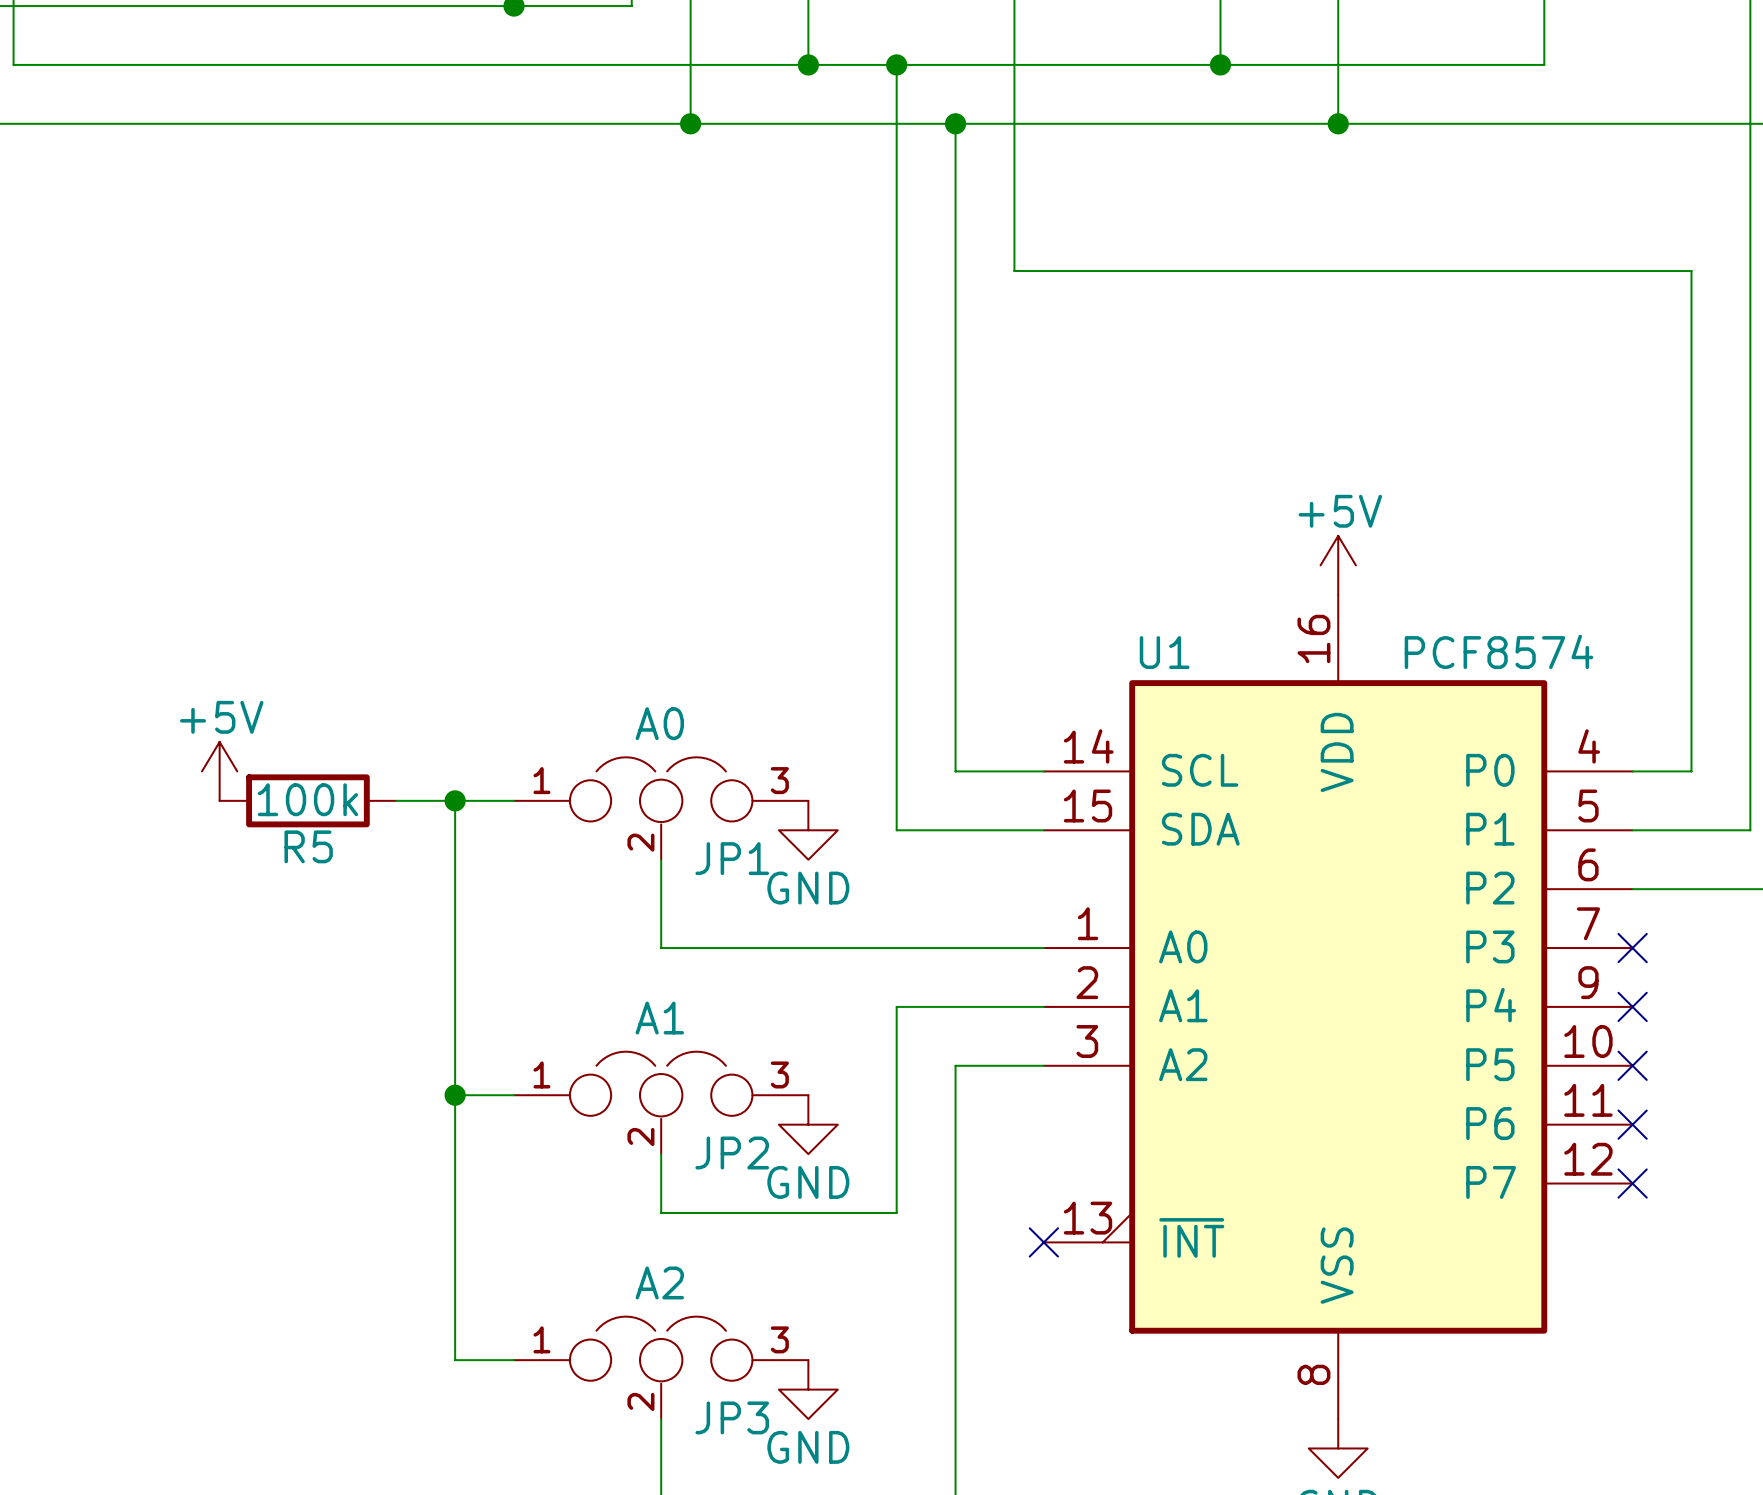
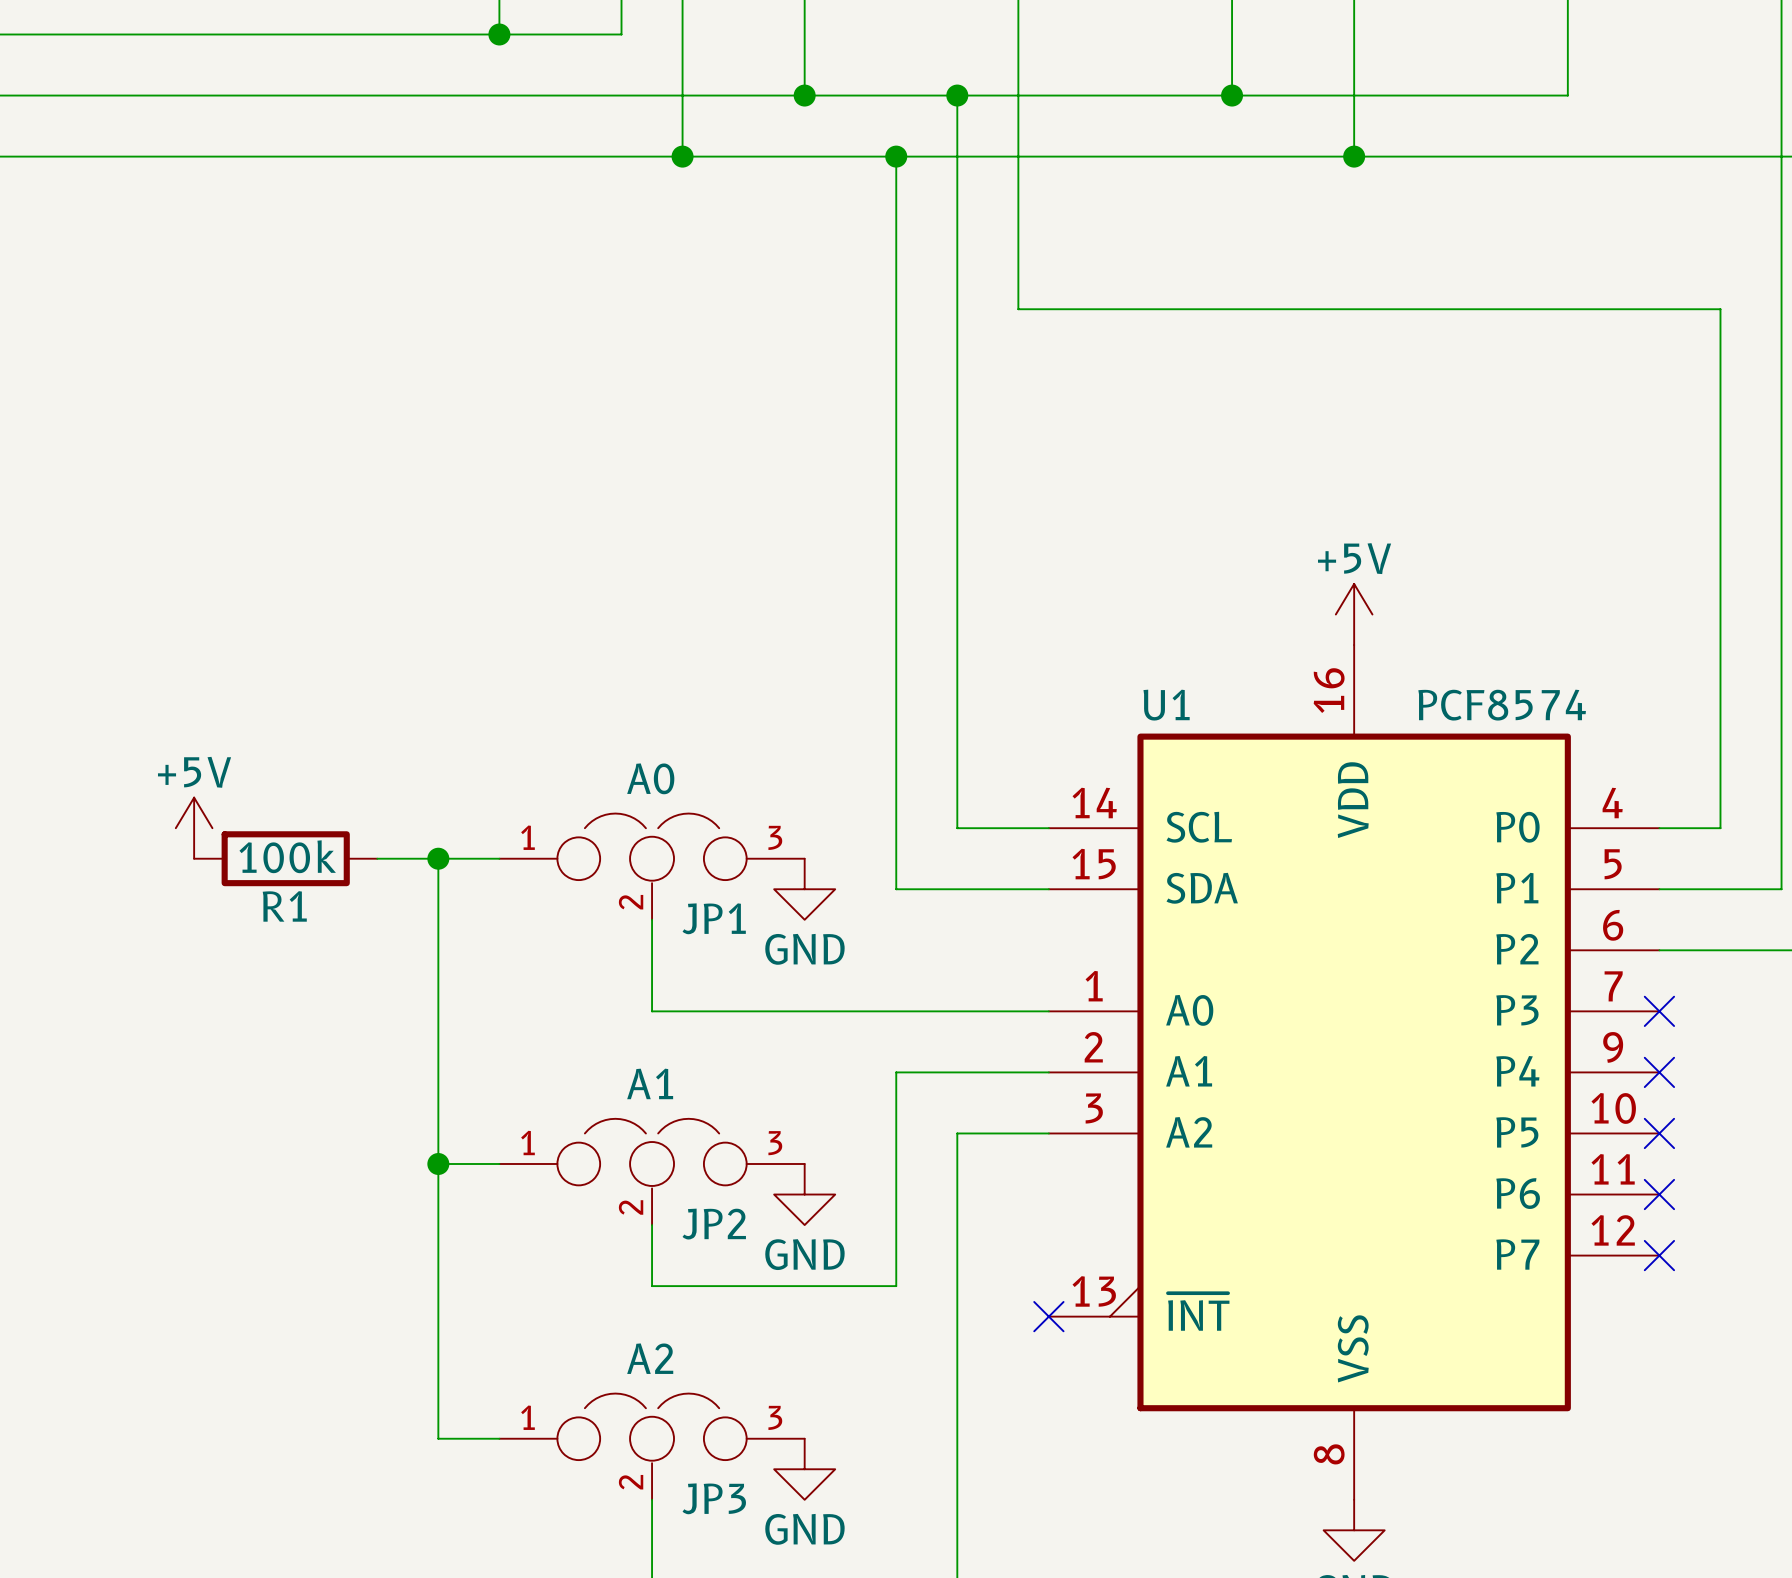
wire: (896, 64) (896, 123) -> (957, 95) (957, 156)
junction: (896, 64) -> none
junction: none -> (957, 95)
junction: none -> (896, 156)
junction: (955, 123) -> none
R5 name: R5 (308, 846) -> R1 (284, 906)

